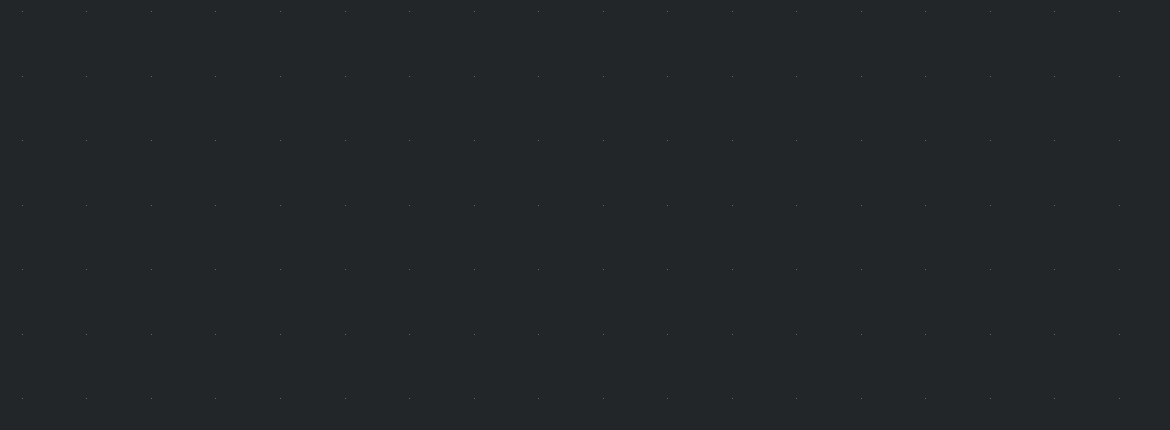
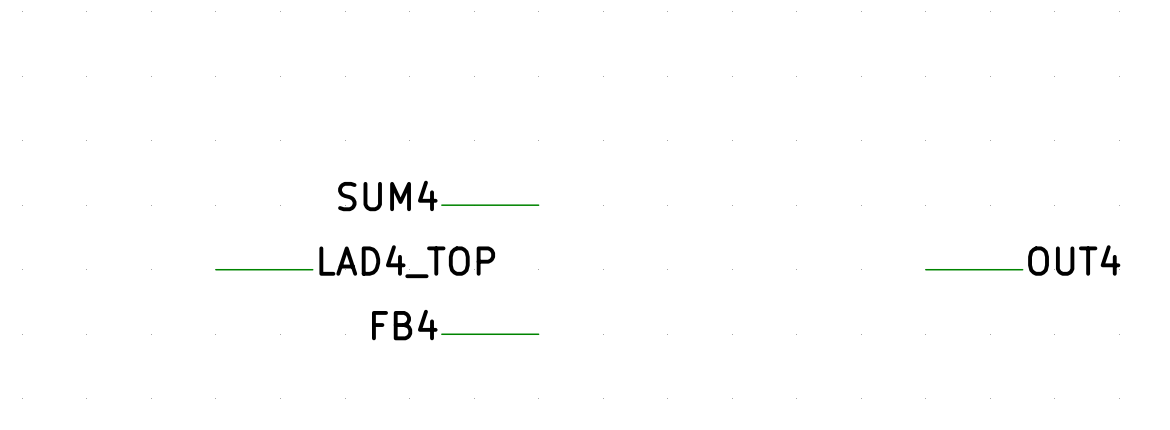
label: none -> SUM4 (387, 195)
wire: none -> (441, 205) (538, 205)
label: none -> OUT4 (1074, 260)
label: none -> LAD4_TOP (407, 261)
wire: none -> (215, 269) (312, 269)
wire: none -> (925, 269) (1022, 269)
label: none -> FB4 (404, 325)
wire: none -> (441, 334) (538, 334)

